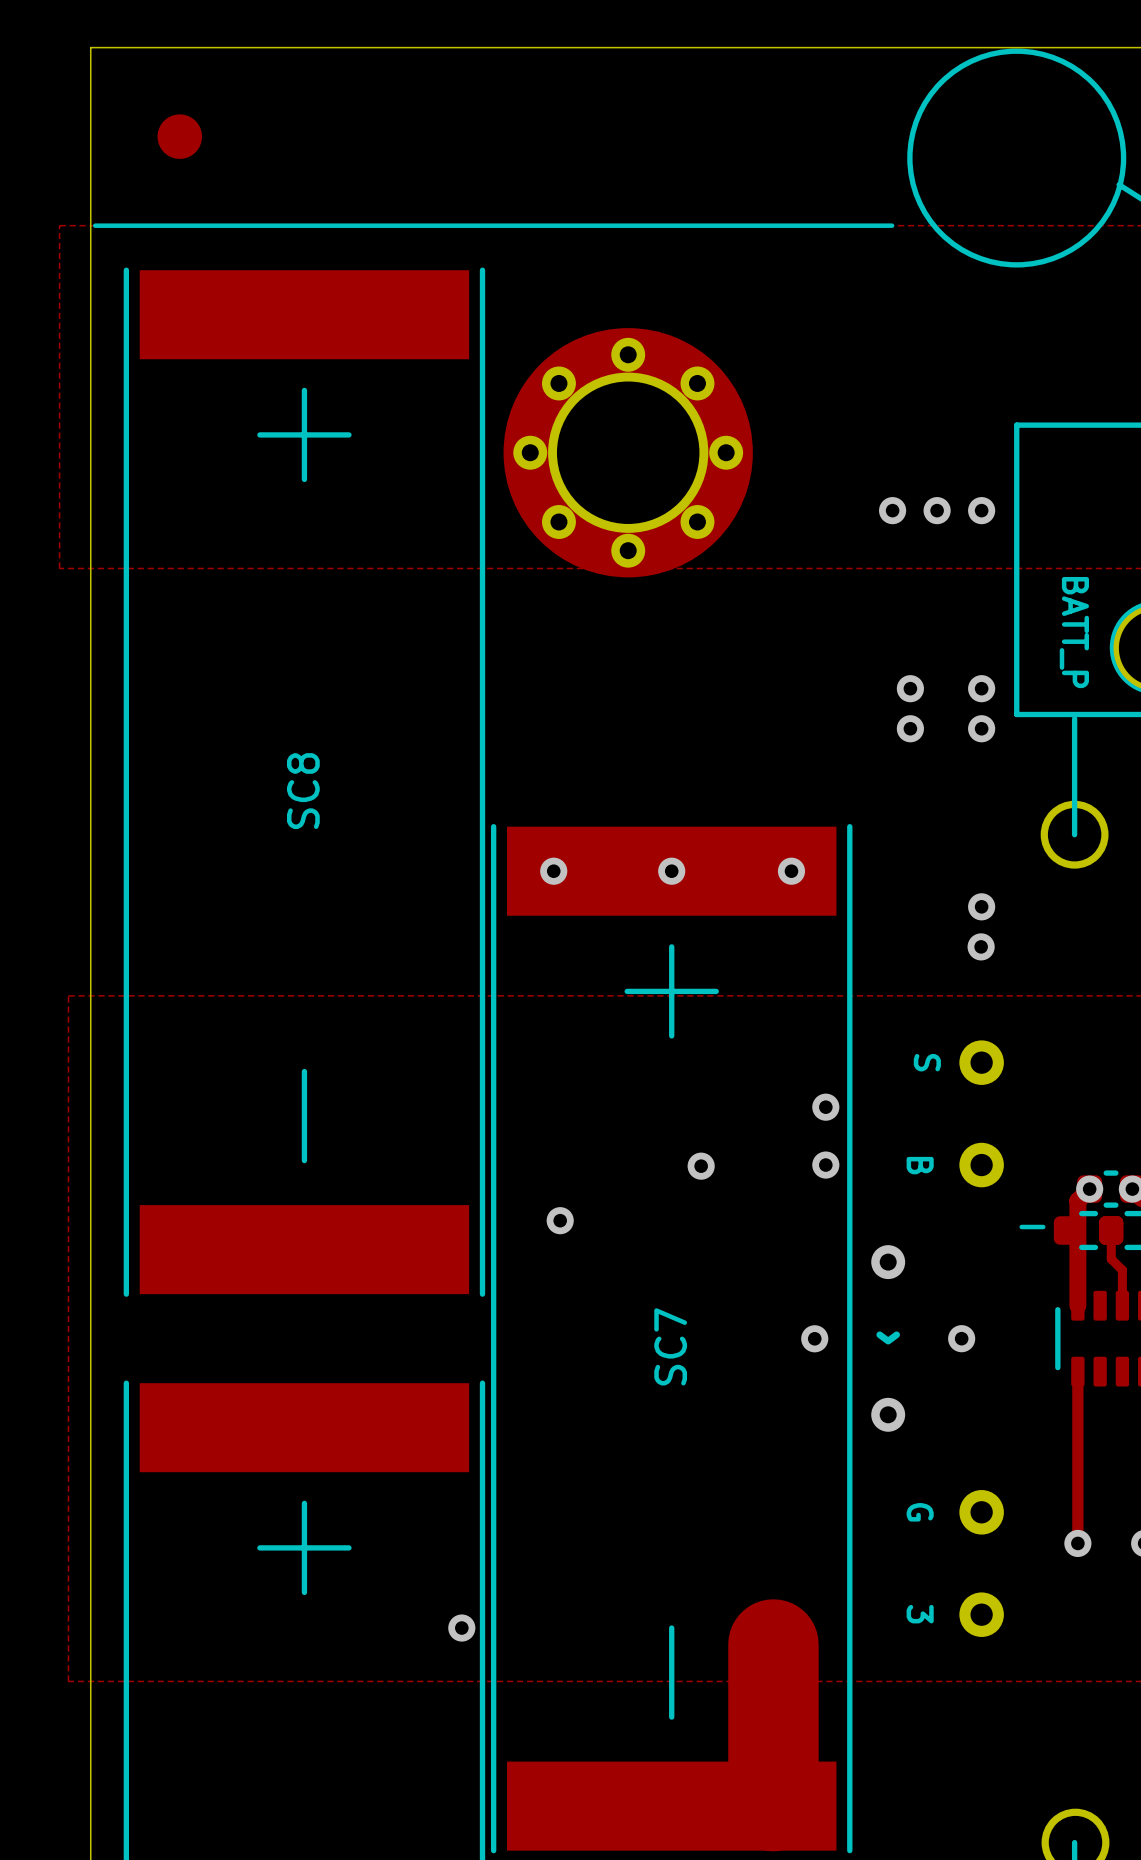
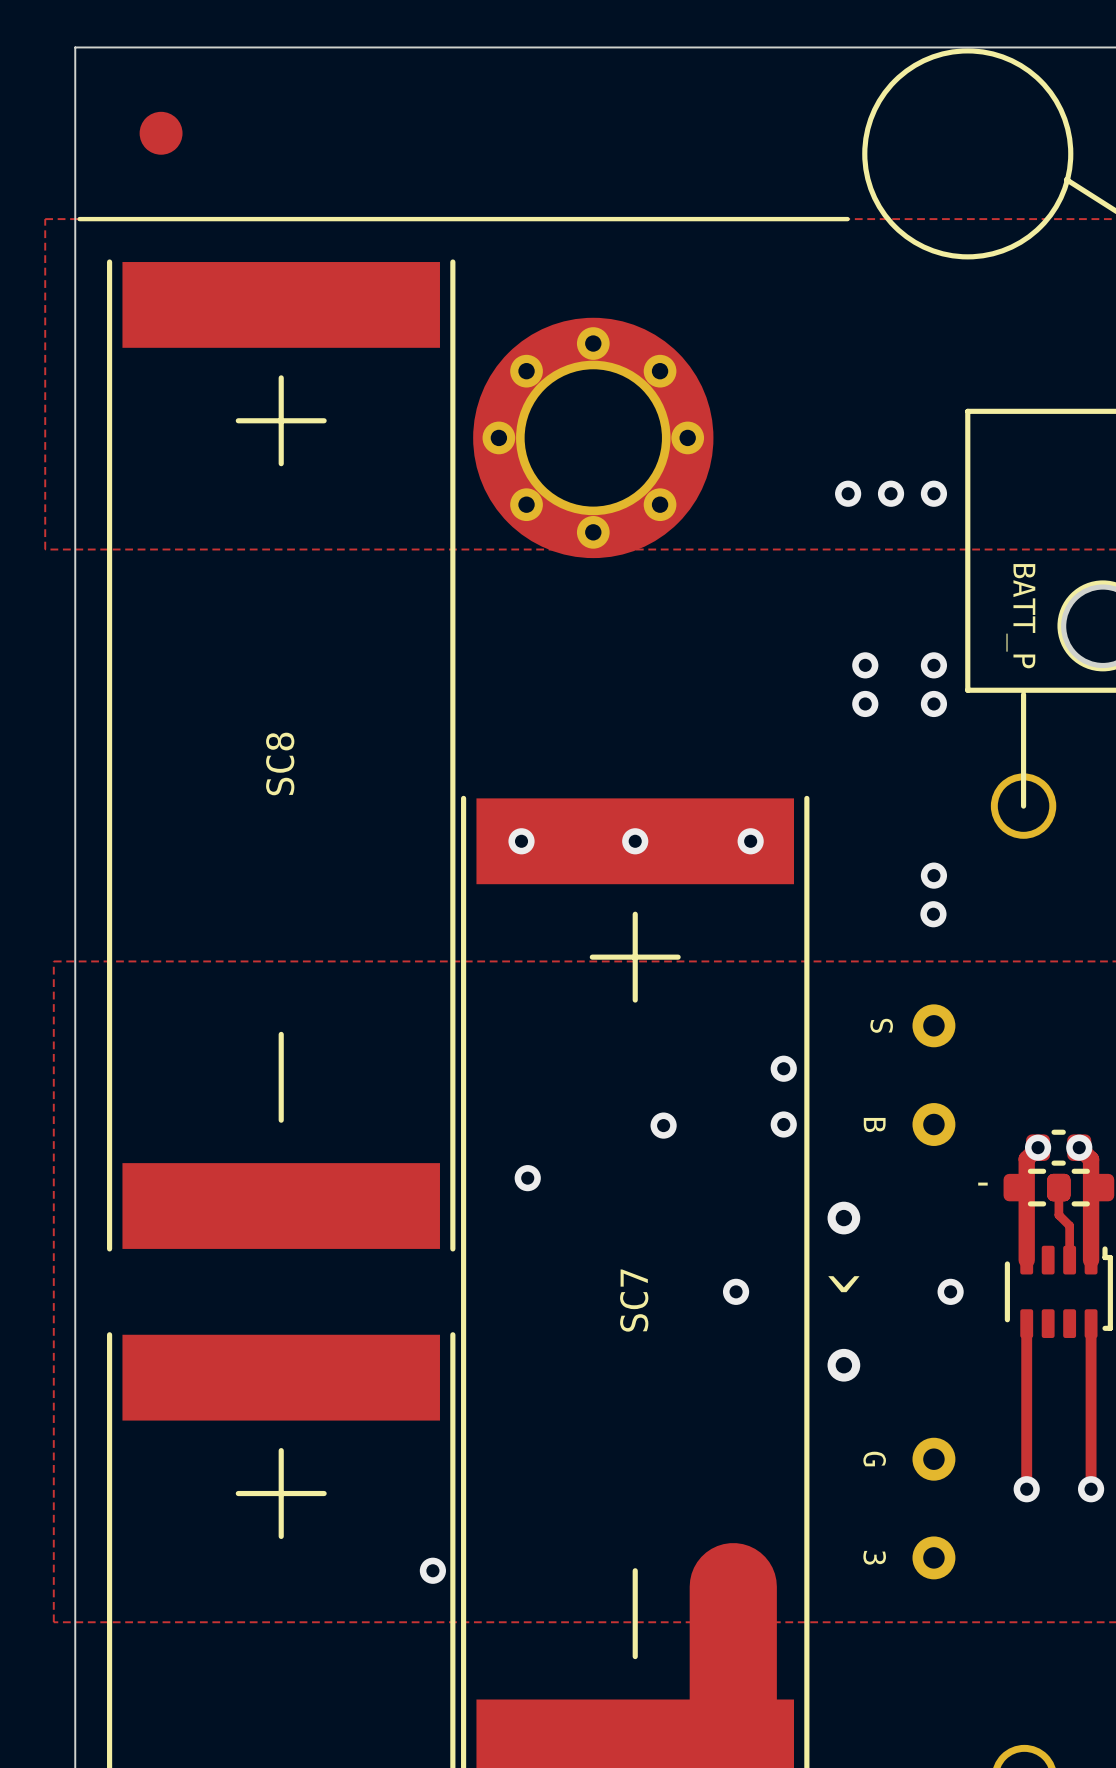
via position: (814, 1338) -> (736, 1291)
via position: (961, 1338) -> (950, 1291)

